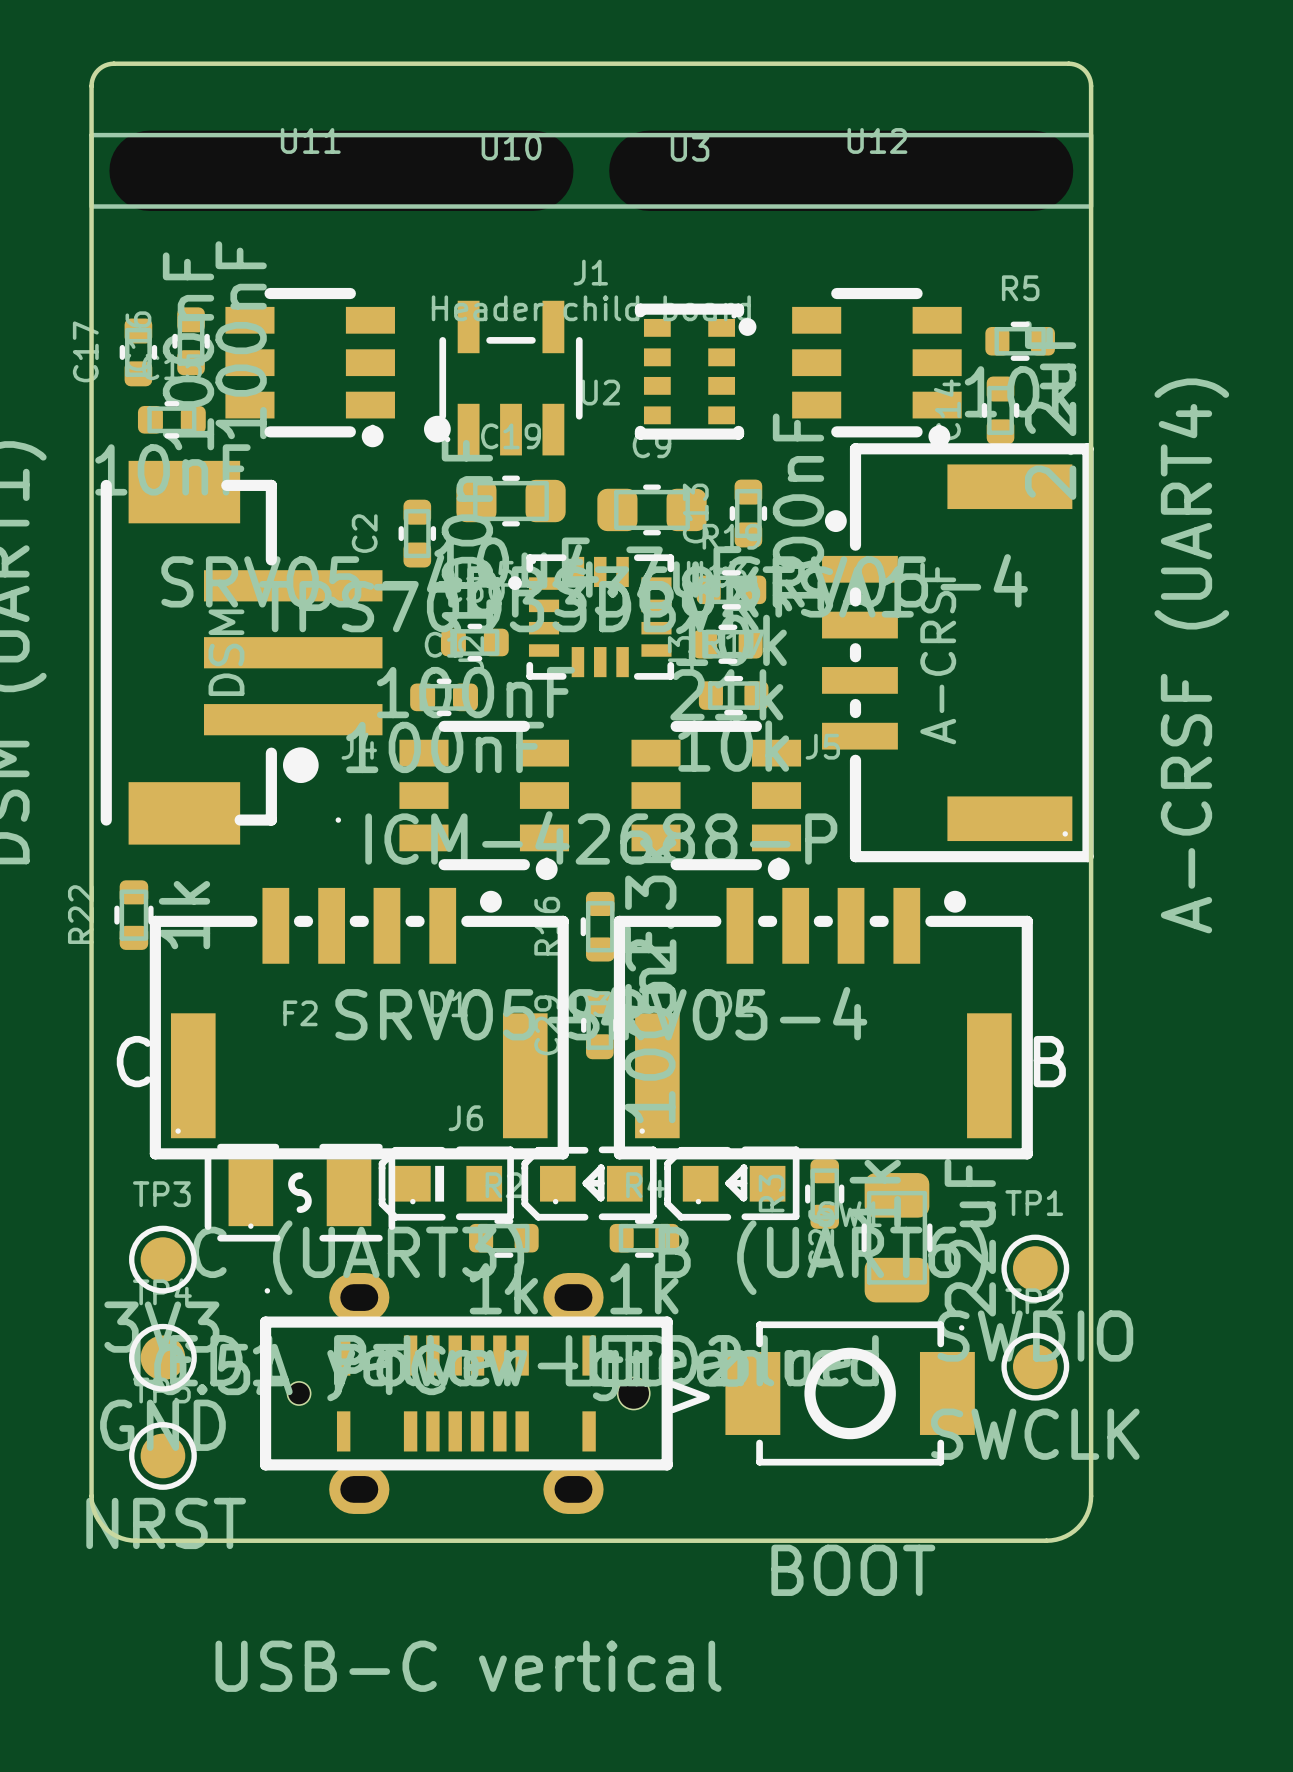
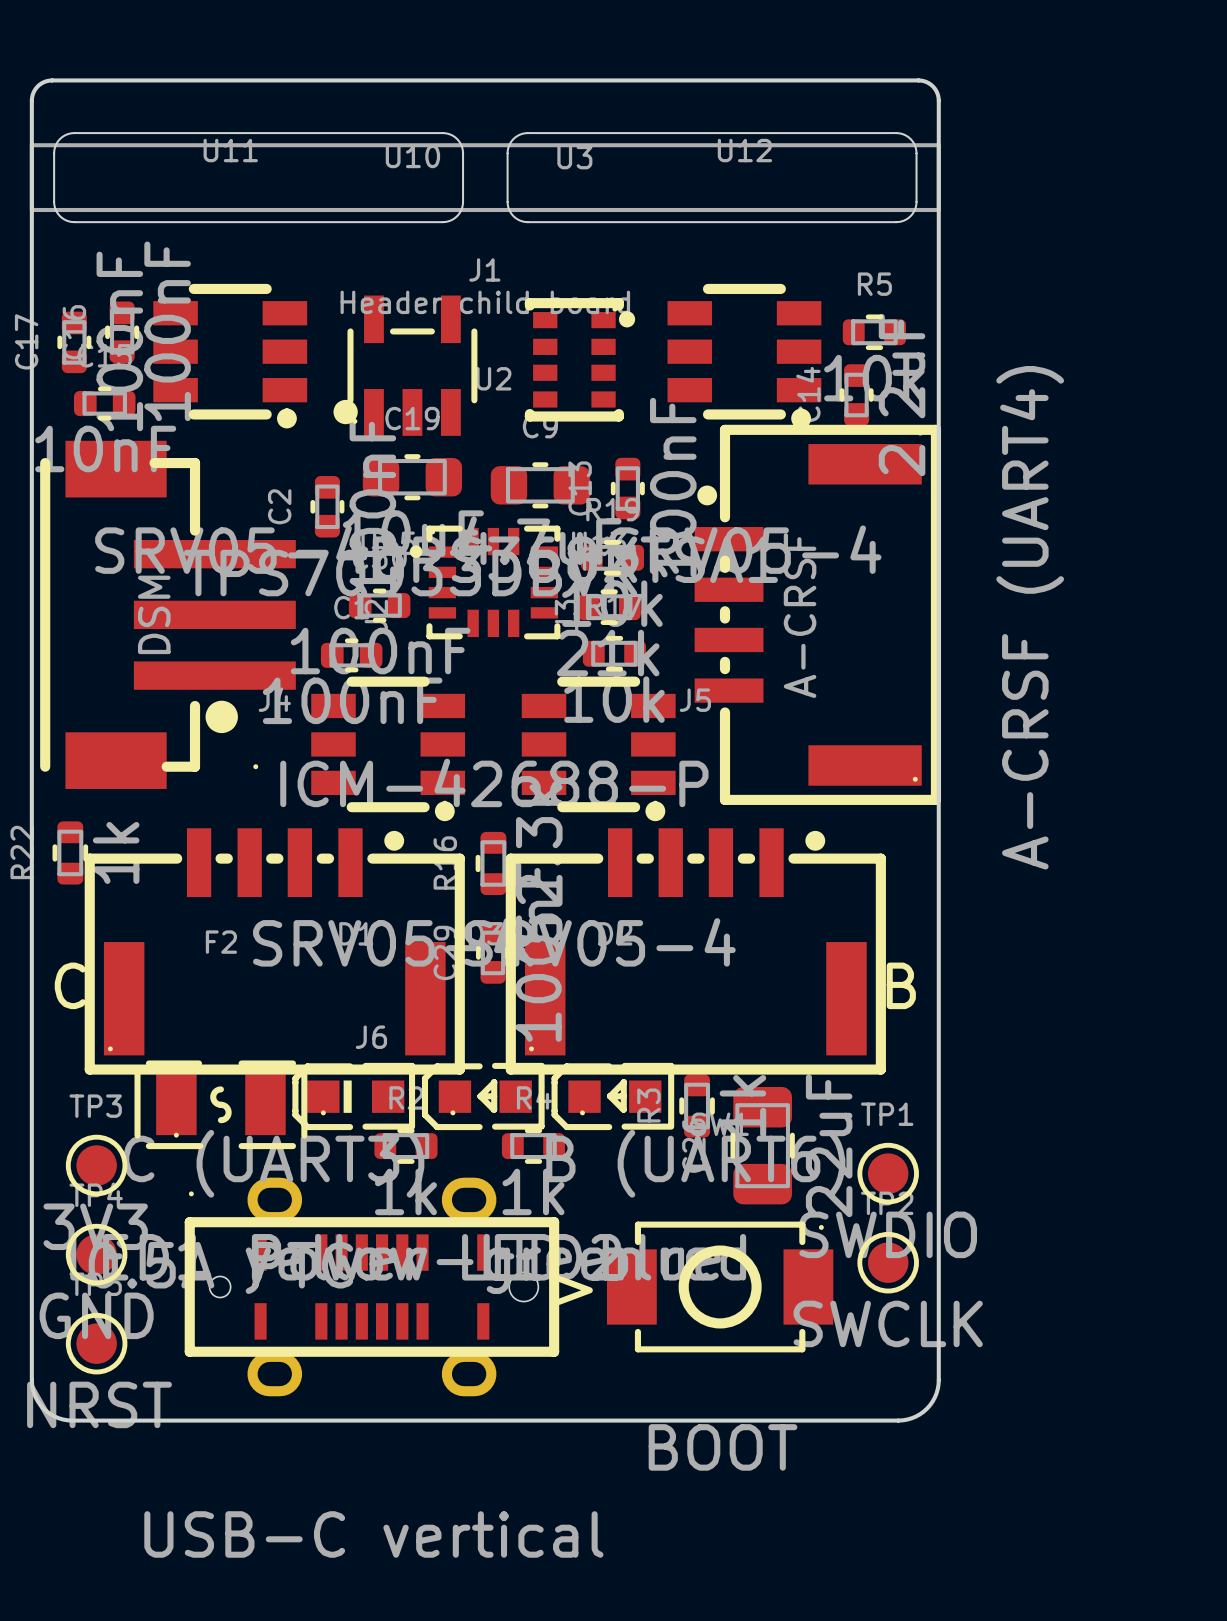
J1 footprint: [89, 130, 1094, 211] -> [29, 132, 941, 224]

